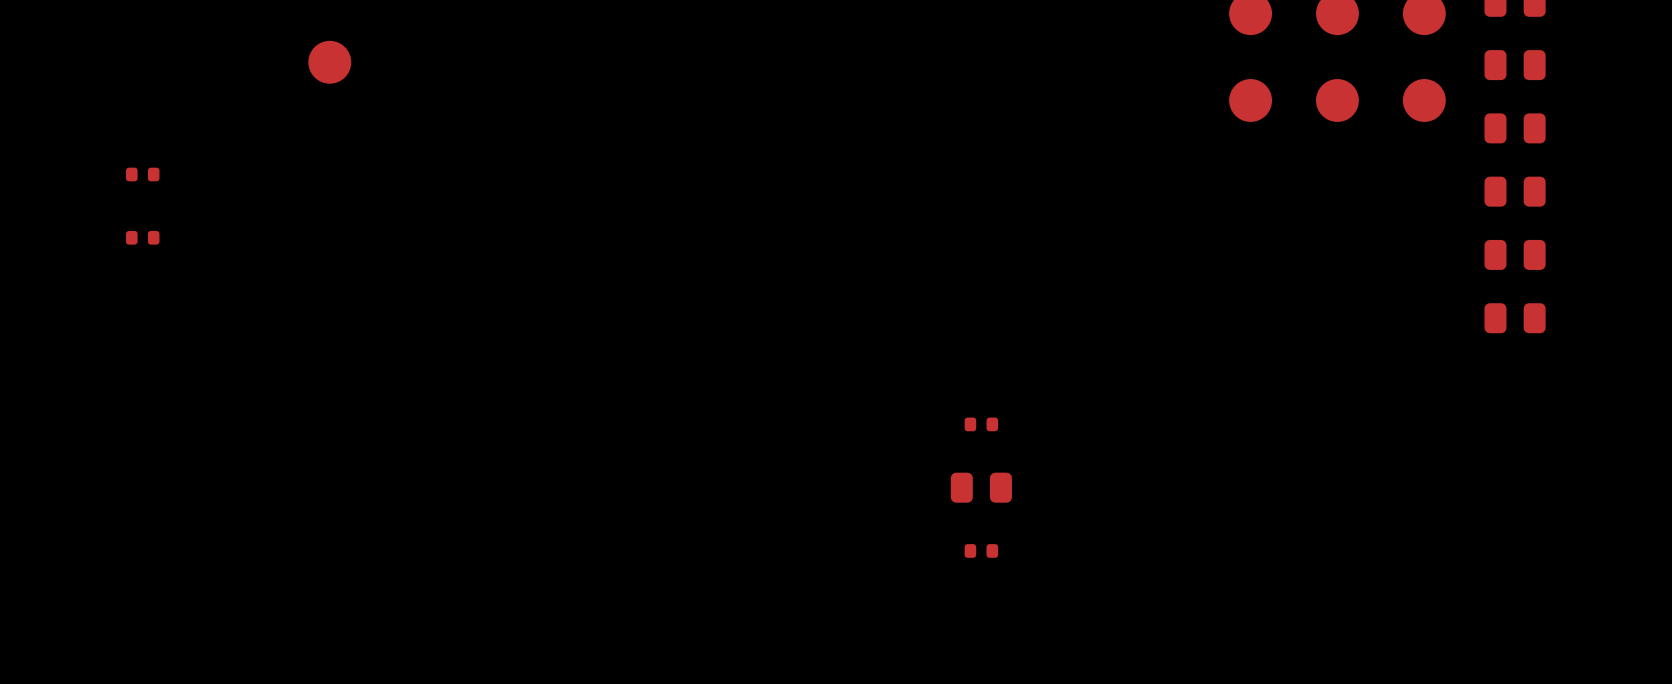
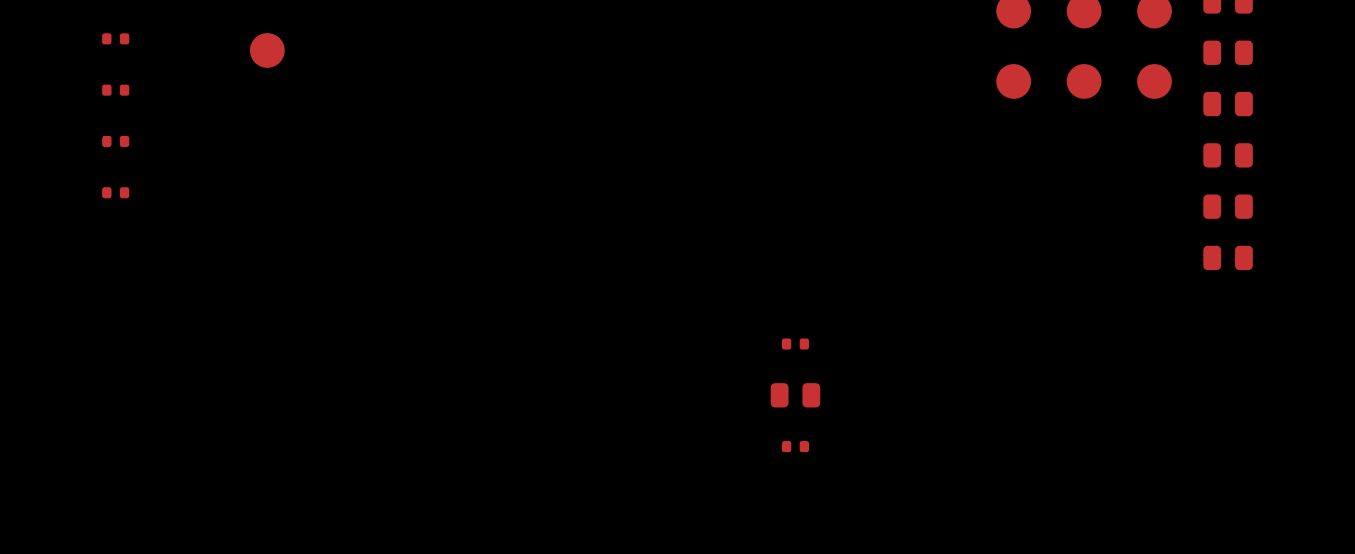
part: none -> (115, 38)
part: none -> (115, 90)

